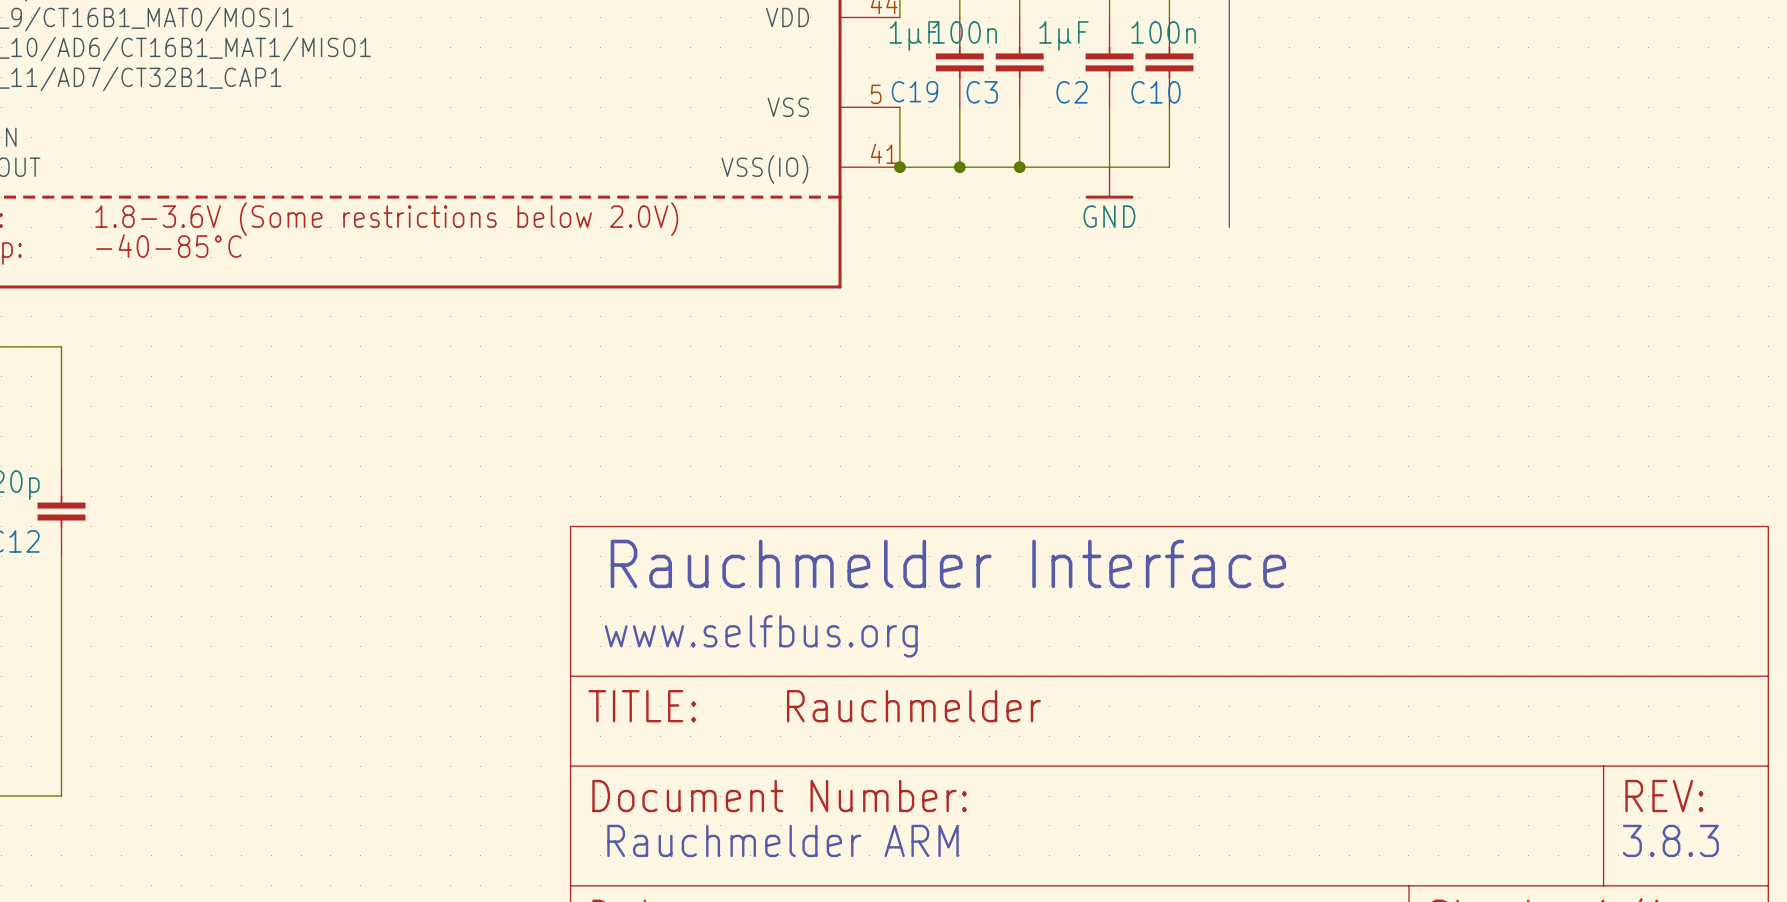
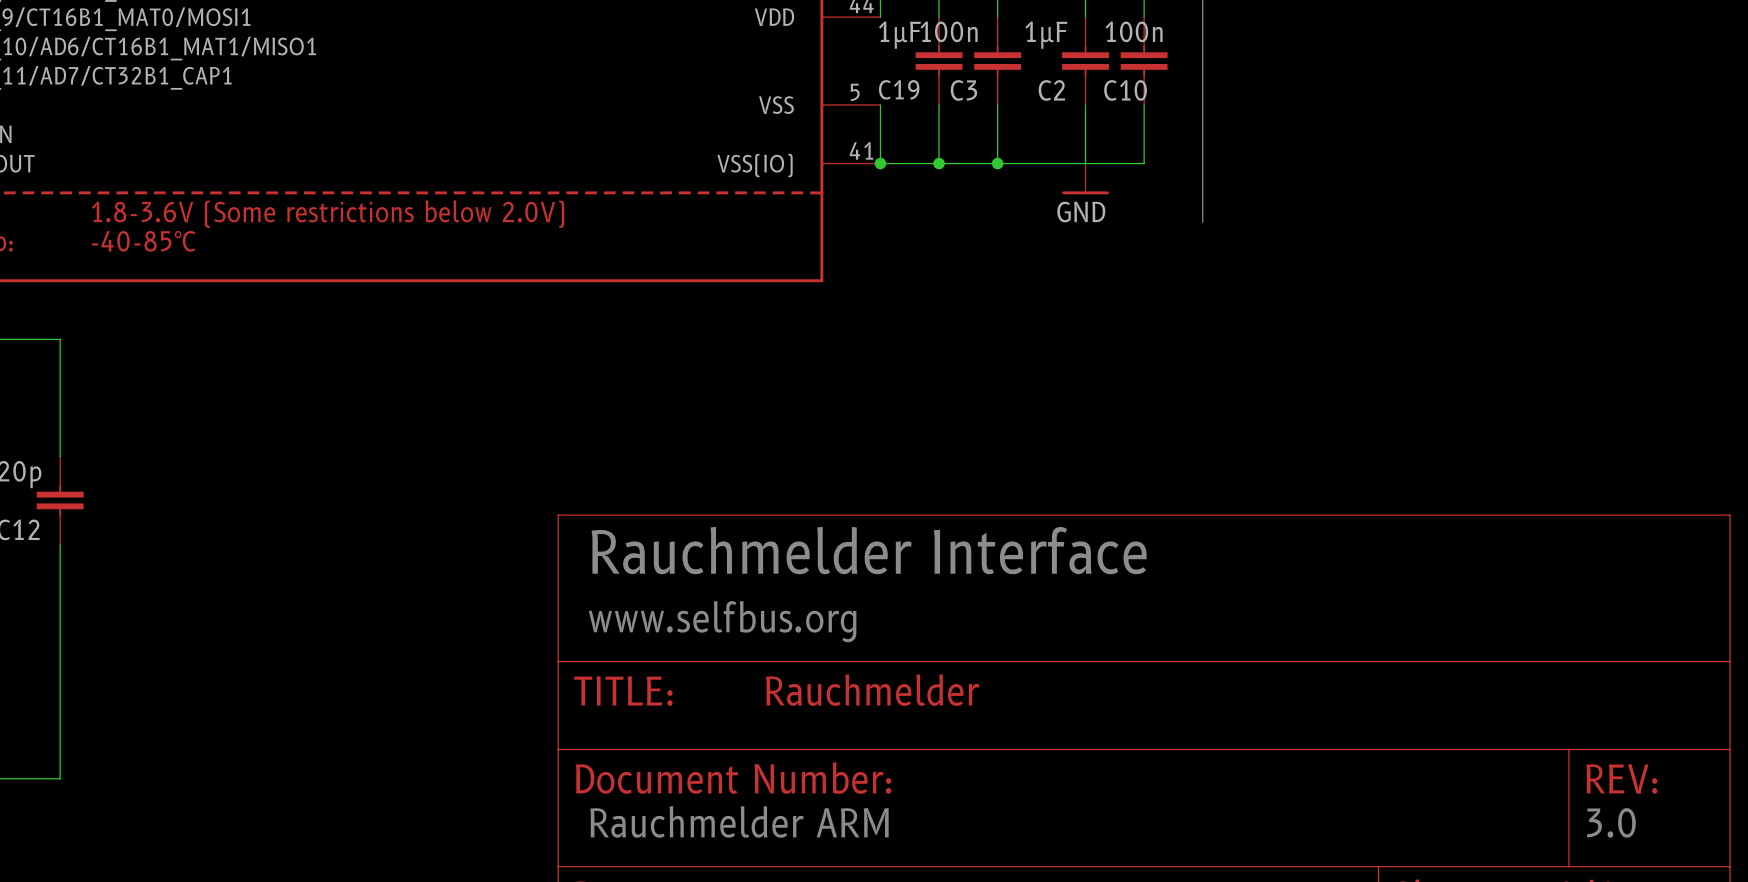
text: 3.8.3 (1670, 840) -> 3.0 (1611, 822)

